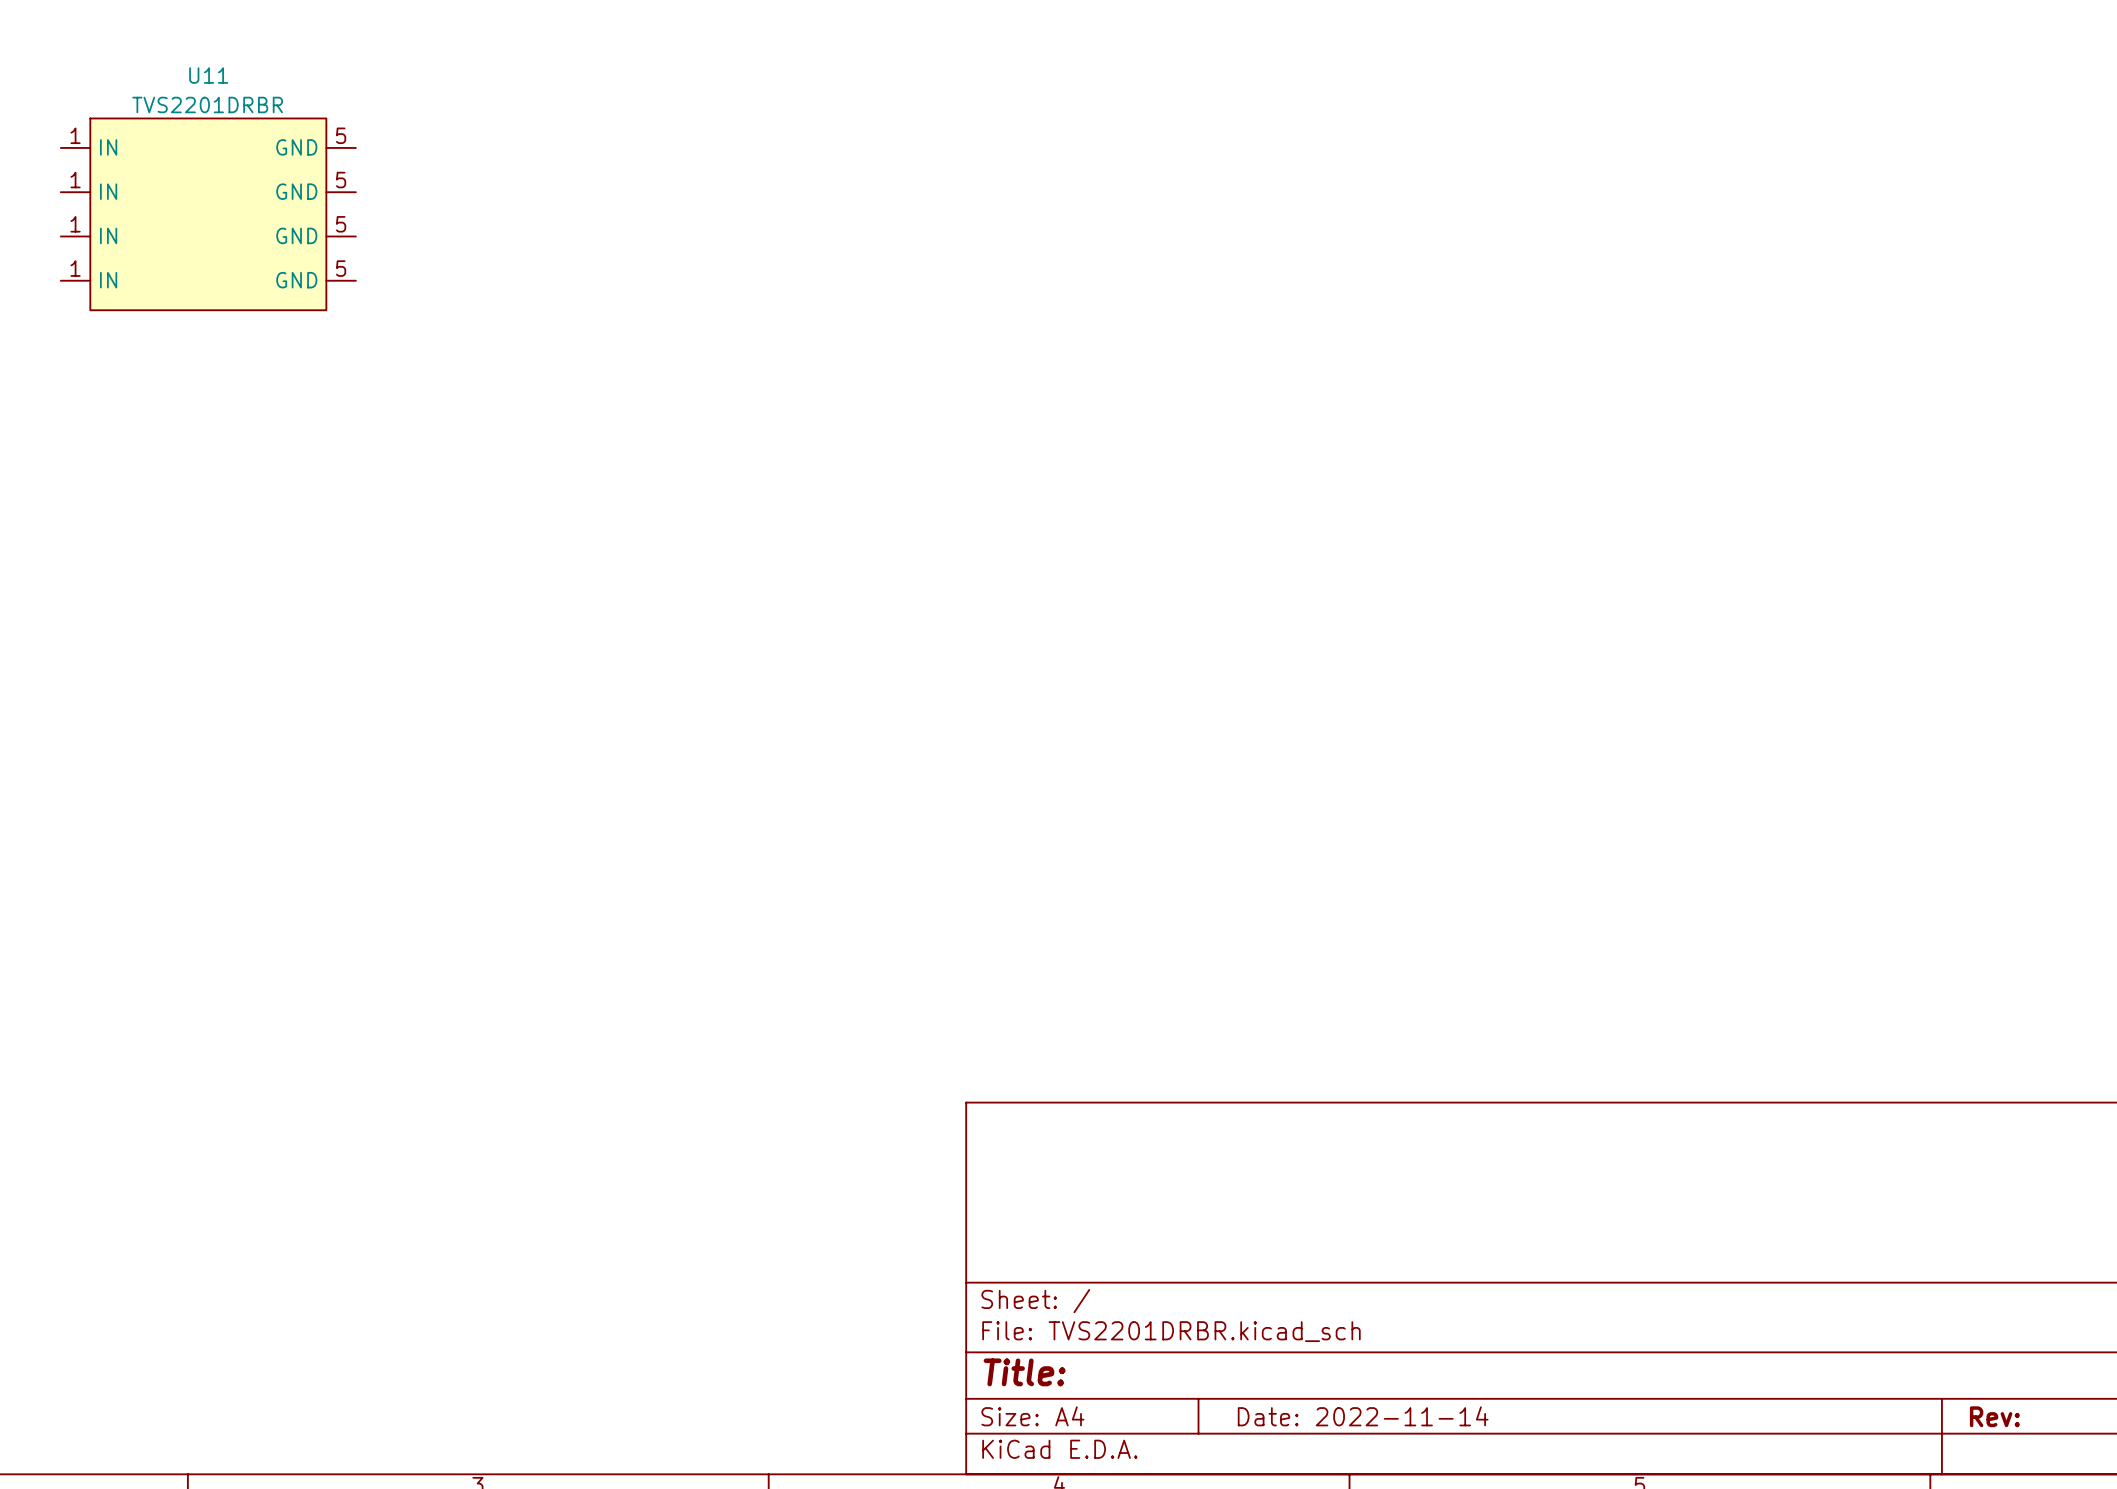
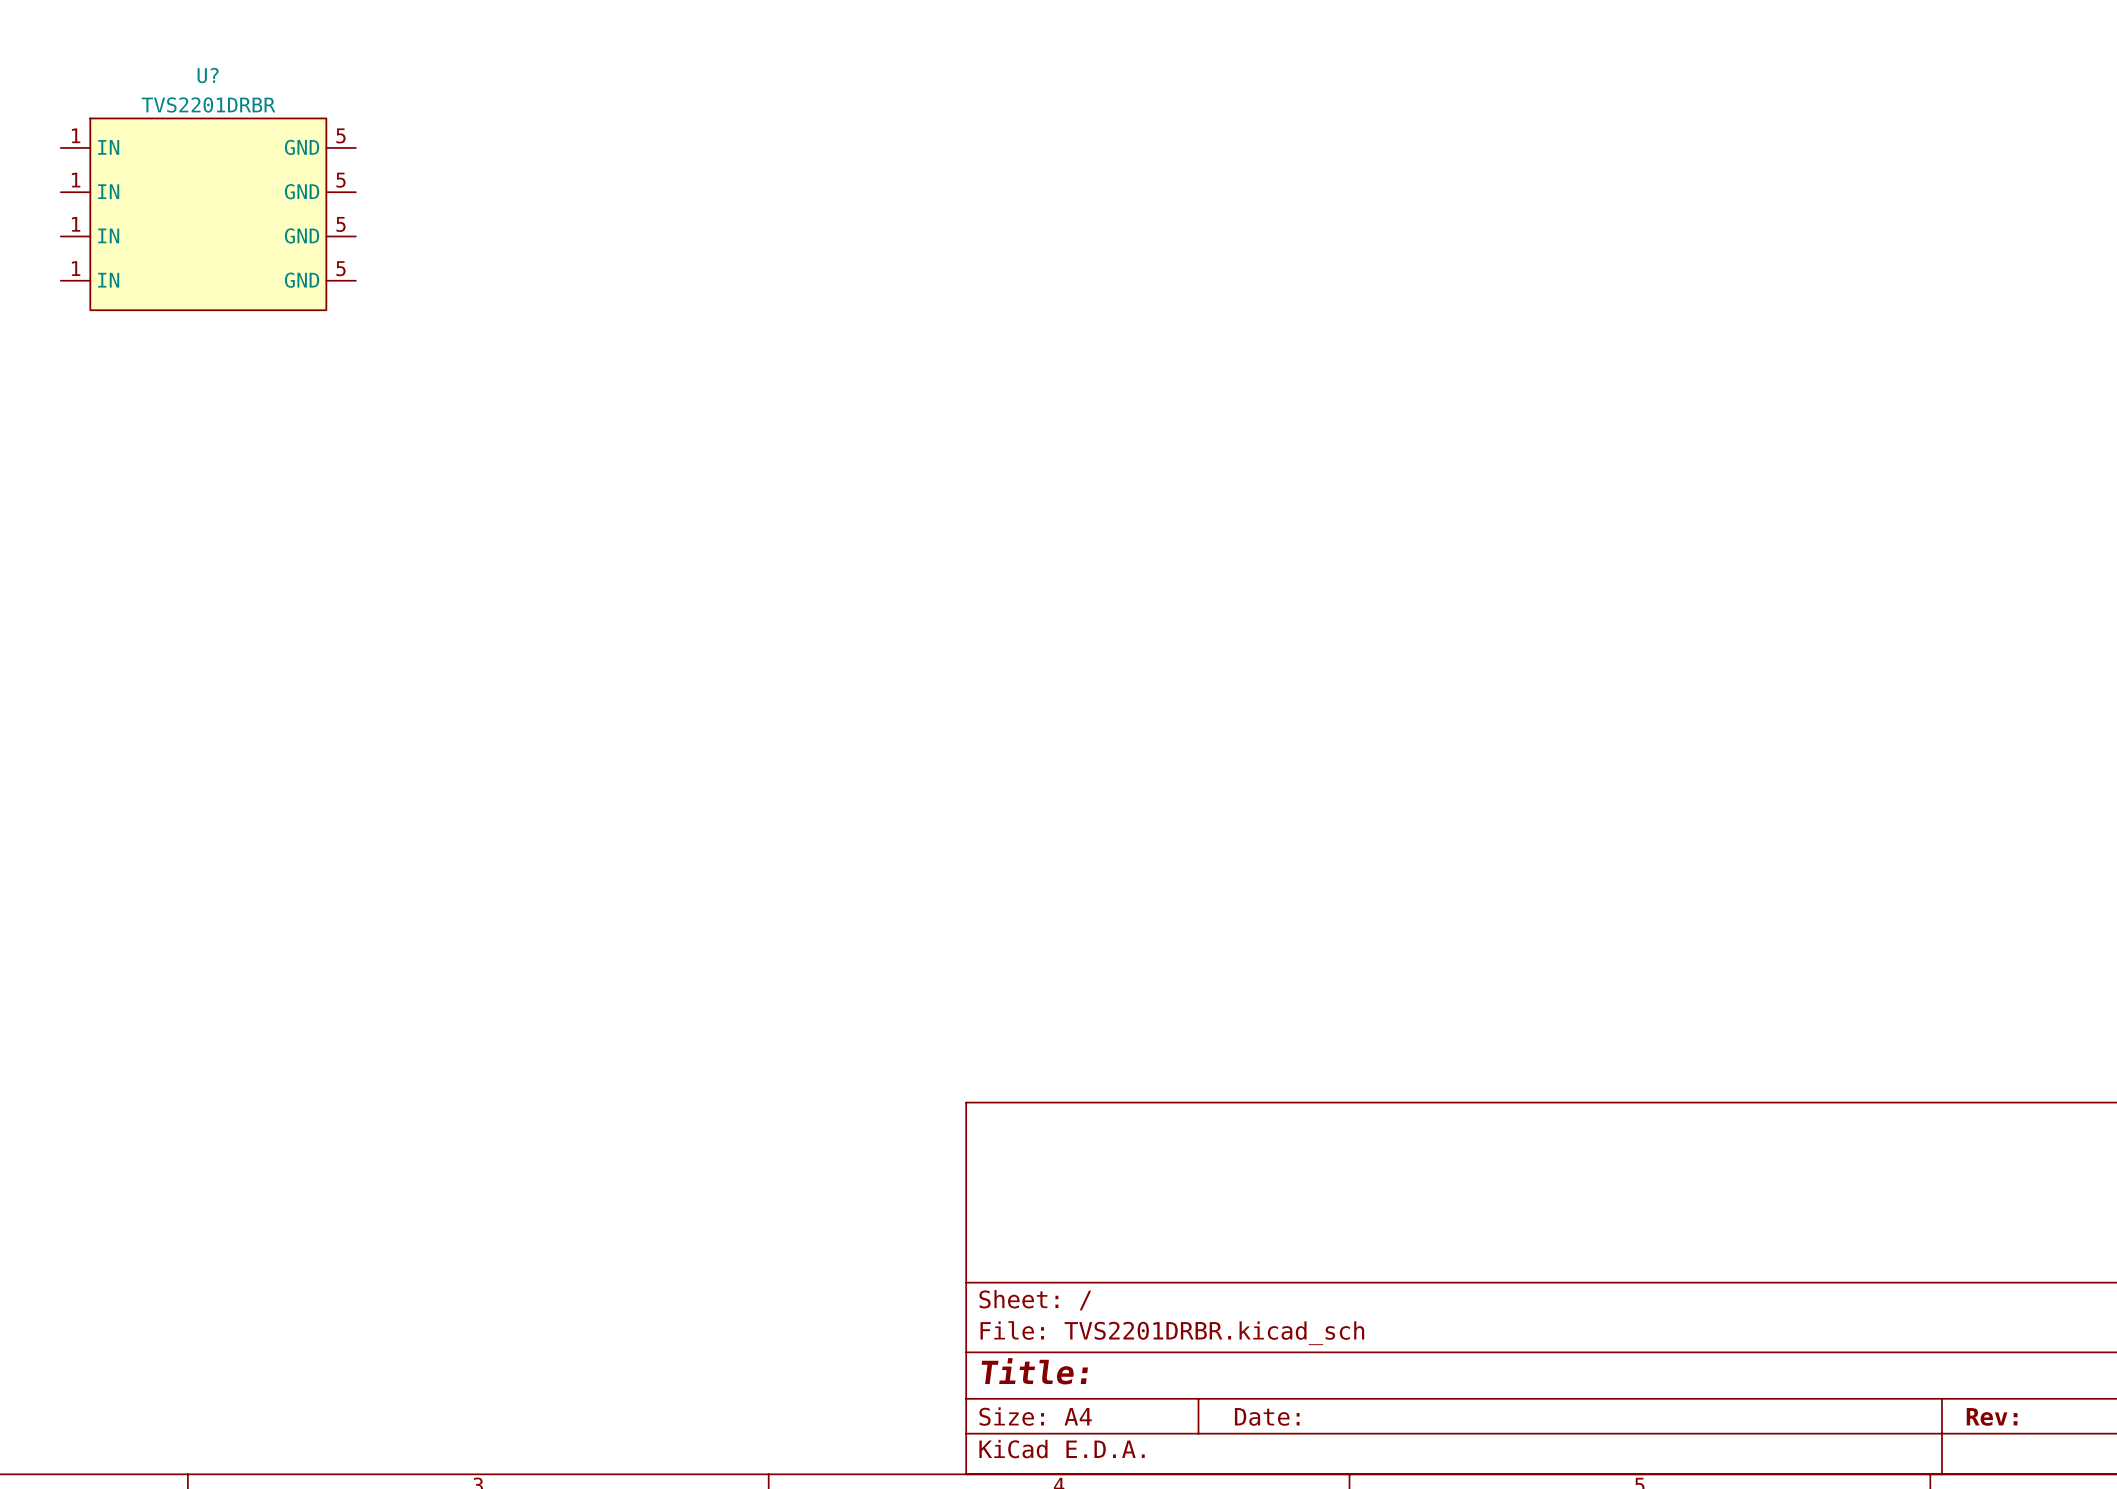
U11 name: U11 (208, 75) -> U? (208, 75)
title block: Date: 2022-11-14 (1363, 1416) -> Date: (1267, 1416)

